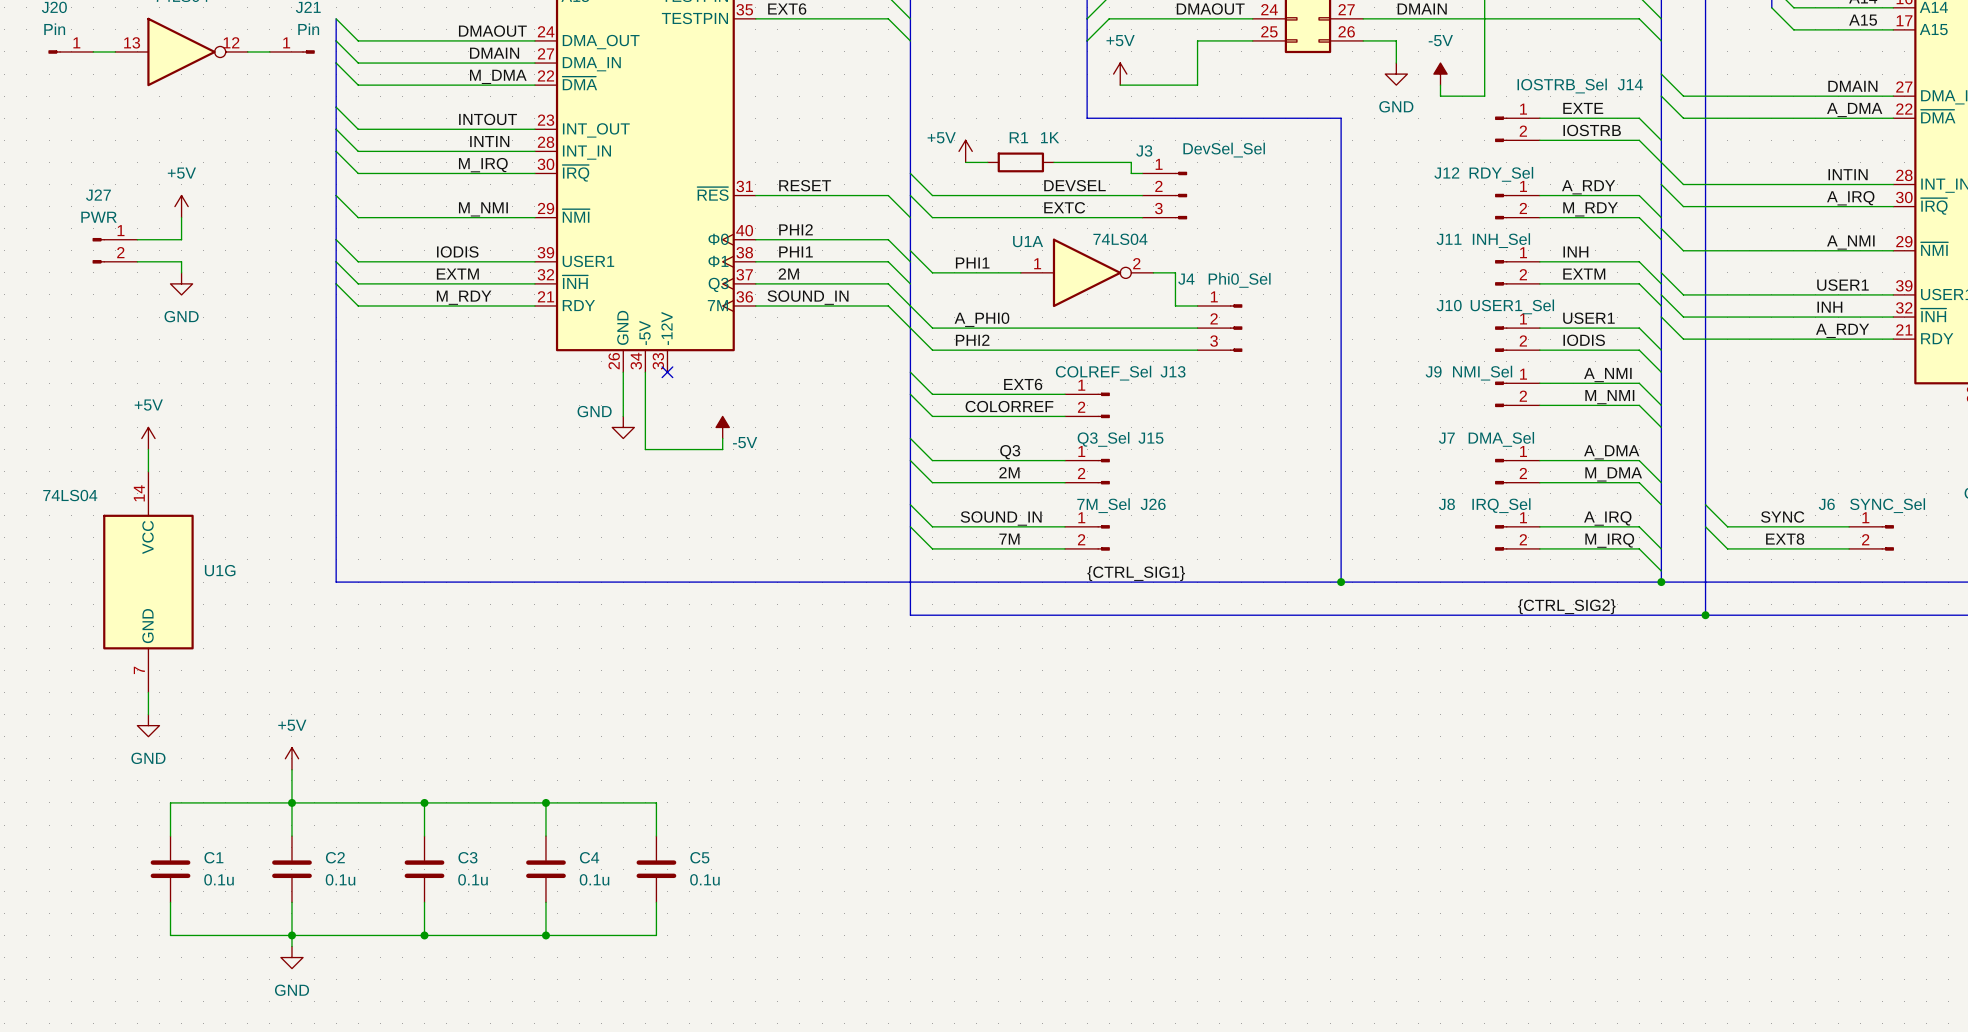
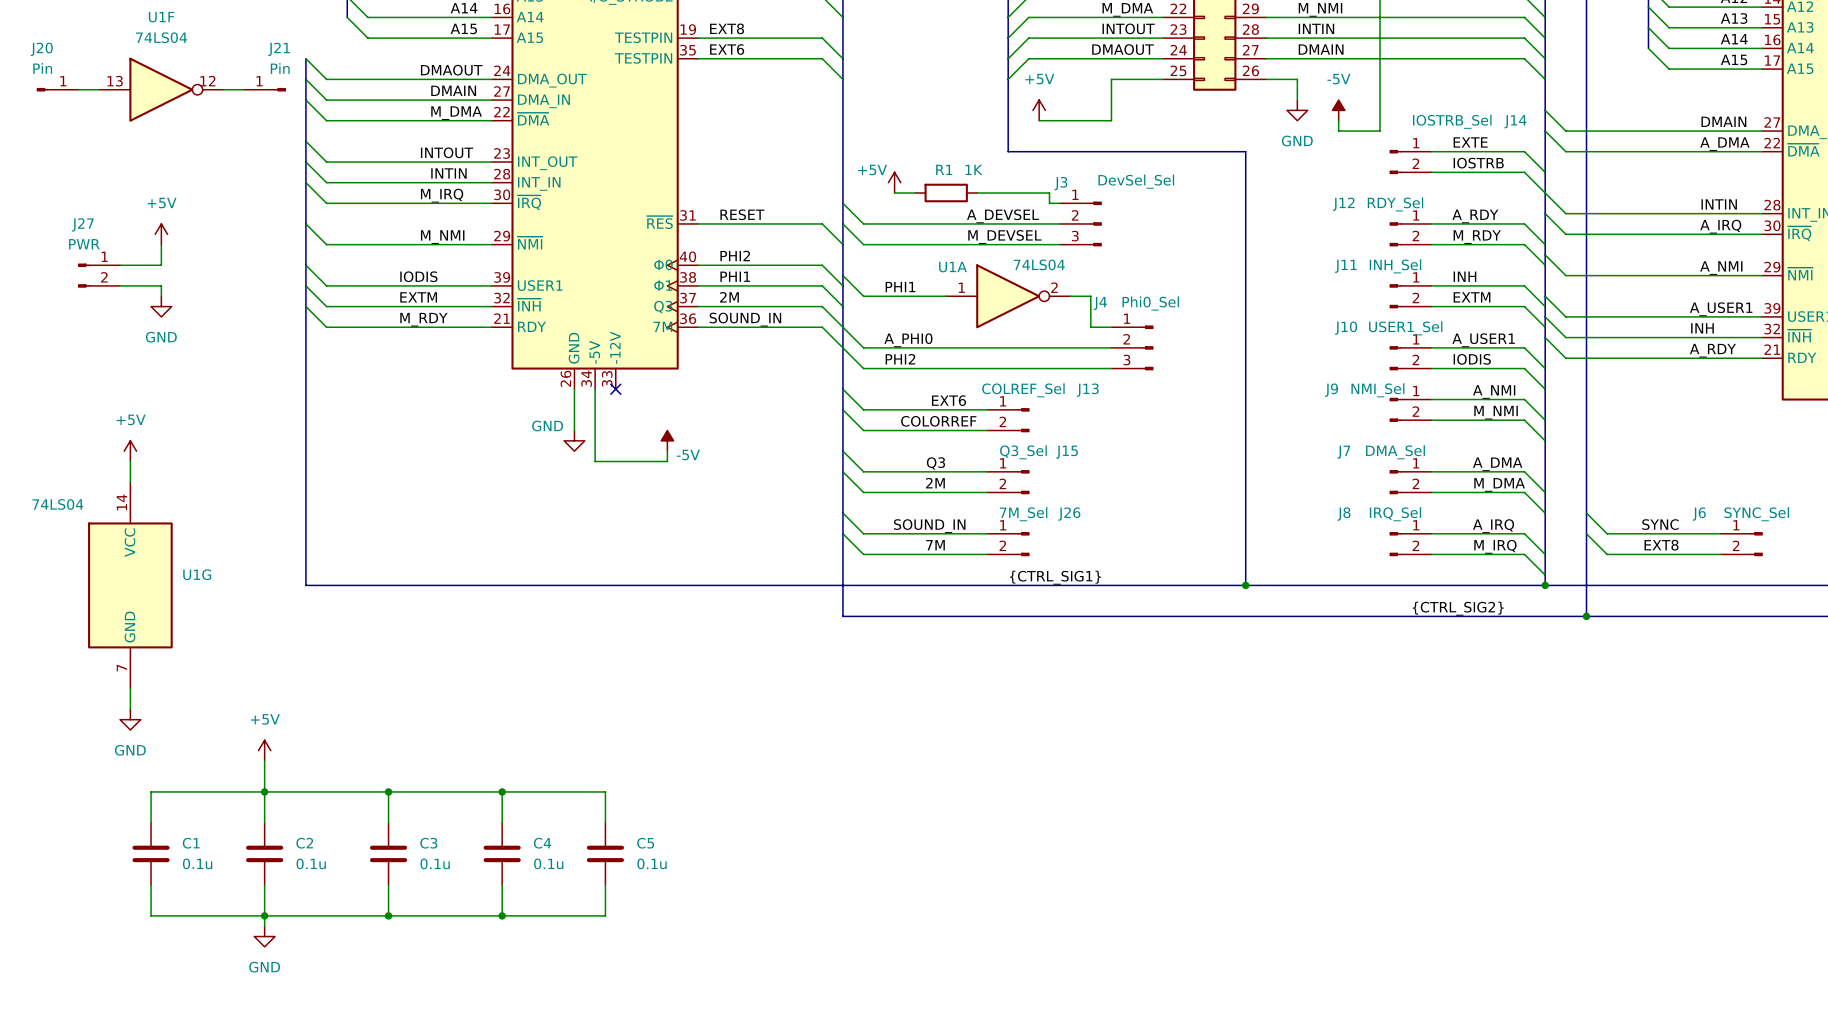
label: DEVSEL (1075, 185) -> A_DEVSEL (1002, 216)
label: EXTC (1064, 207) -> M_DEVSEL (1004, 236)
label: USER1 (1842, 285) -> A_USER1 (1721, 309)
label: USER1 (1588, 318) -> A_USER1 (1483, 340)

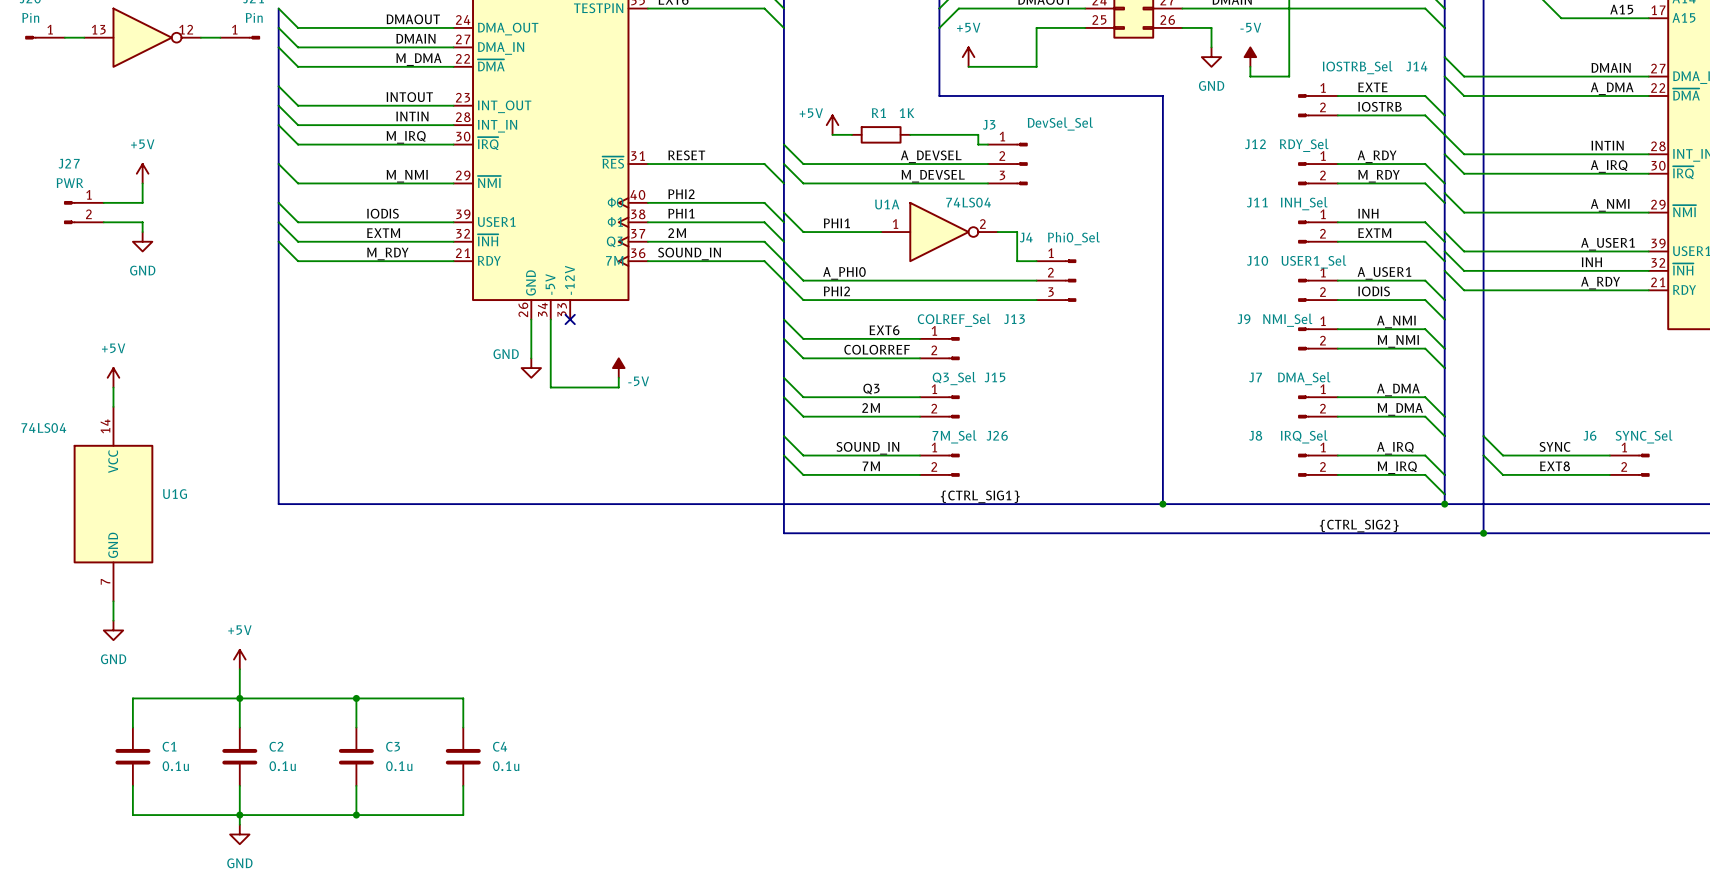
wire: (502, 791) (605, 791) (605, 822) -> none
junction: (502, 791) -> none
C5: 0.1u (605, 853) -> none
wire: (605, 884) (605, 915) (502, 915) -> none
junction: (502, 915) -> none

